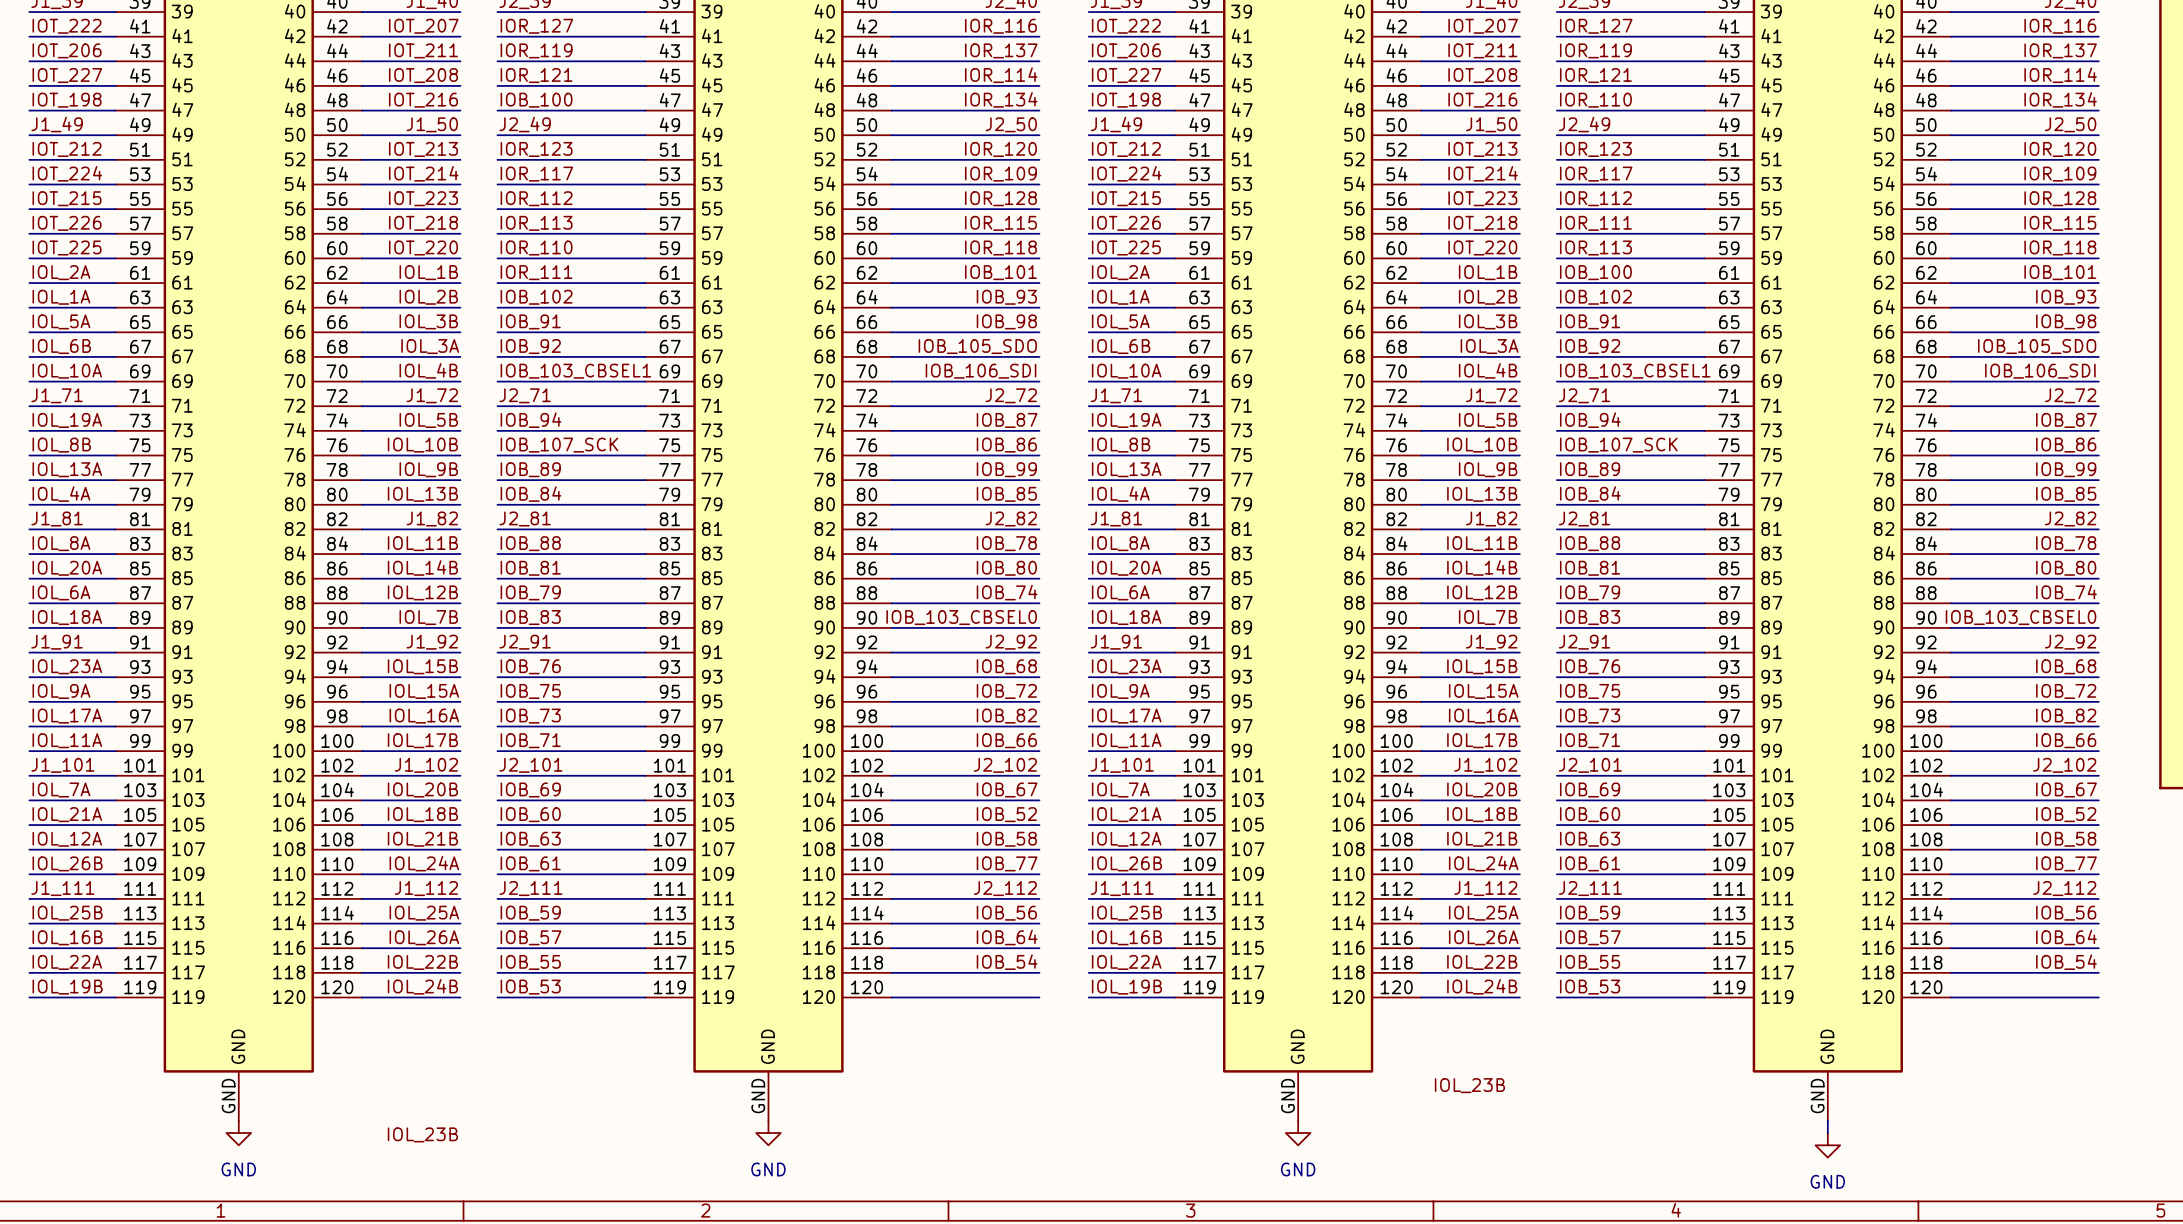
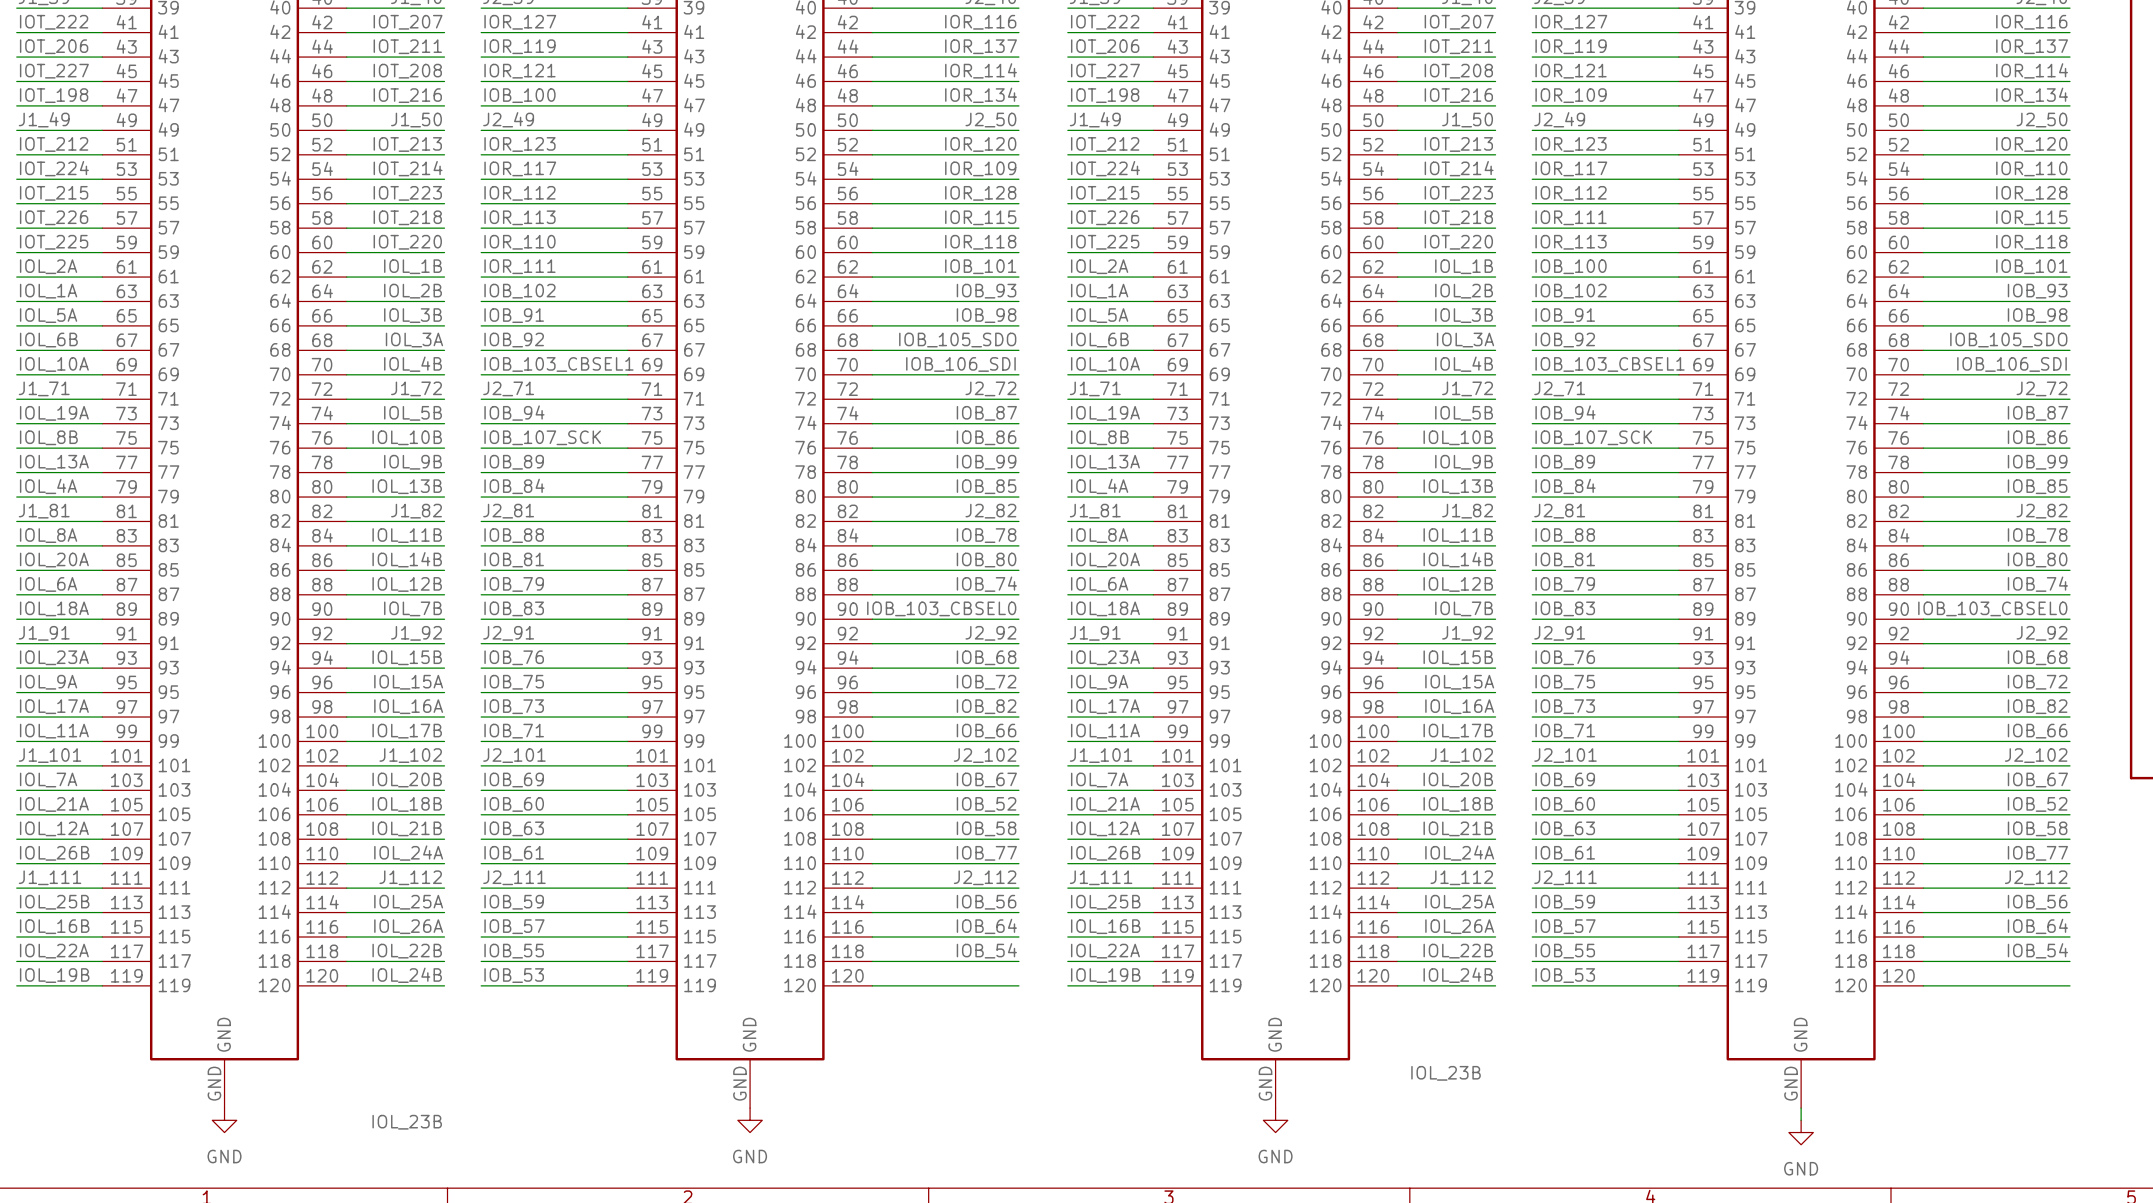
label: IOR_110 (1595, 100) -> IOR_109 (1571, 95)
label: IOR_109 (2060, 174) -> IOR_110 (2031, 168)

